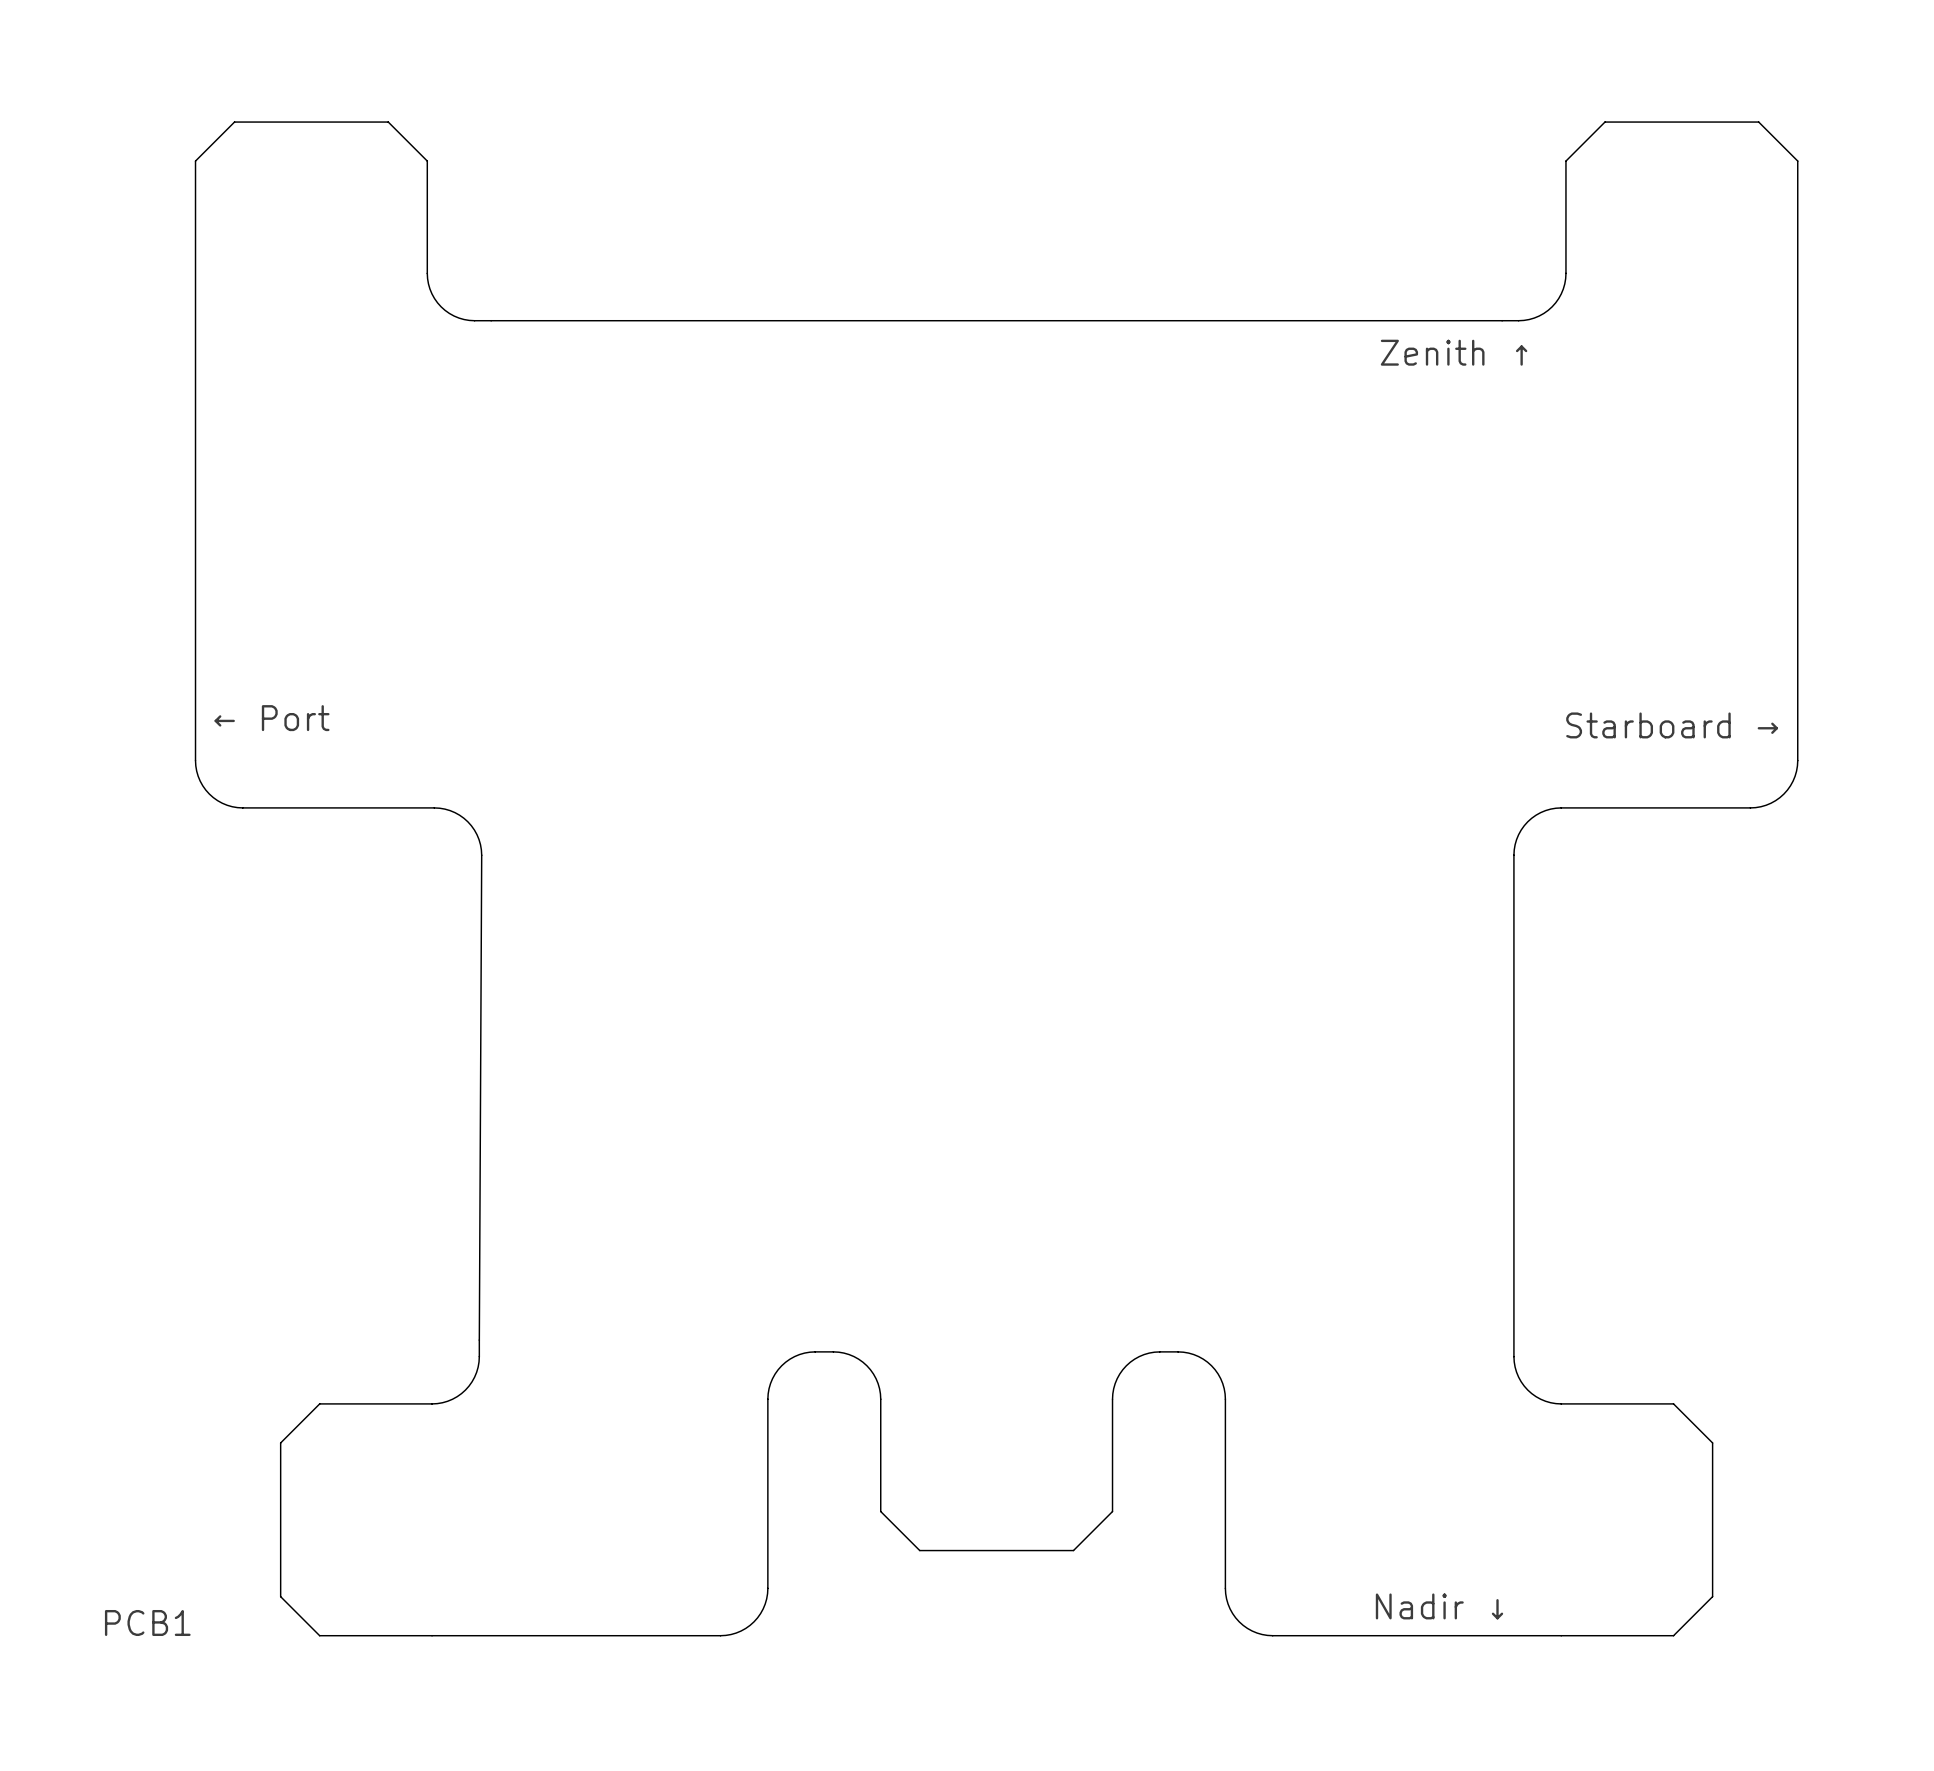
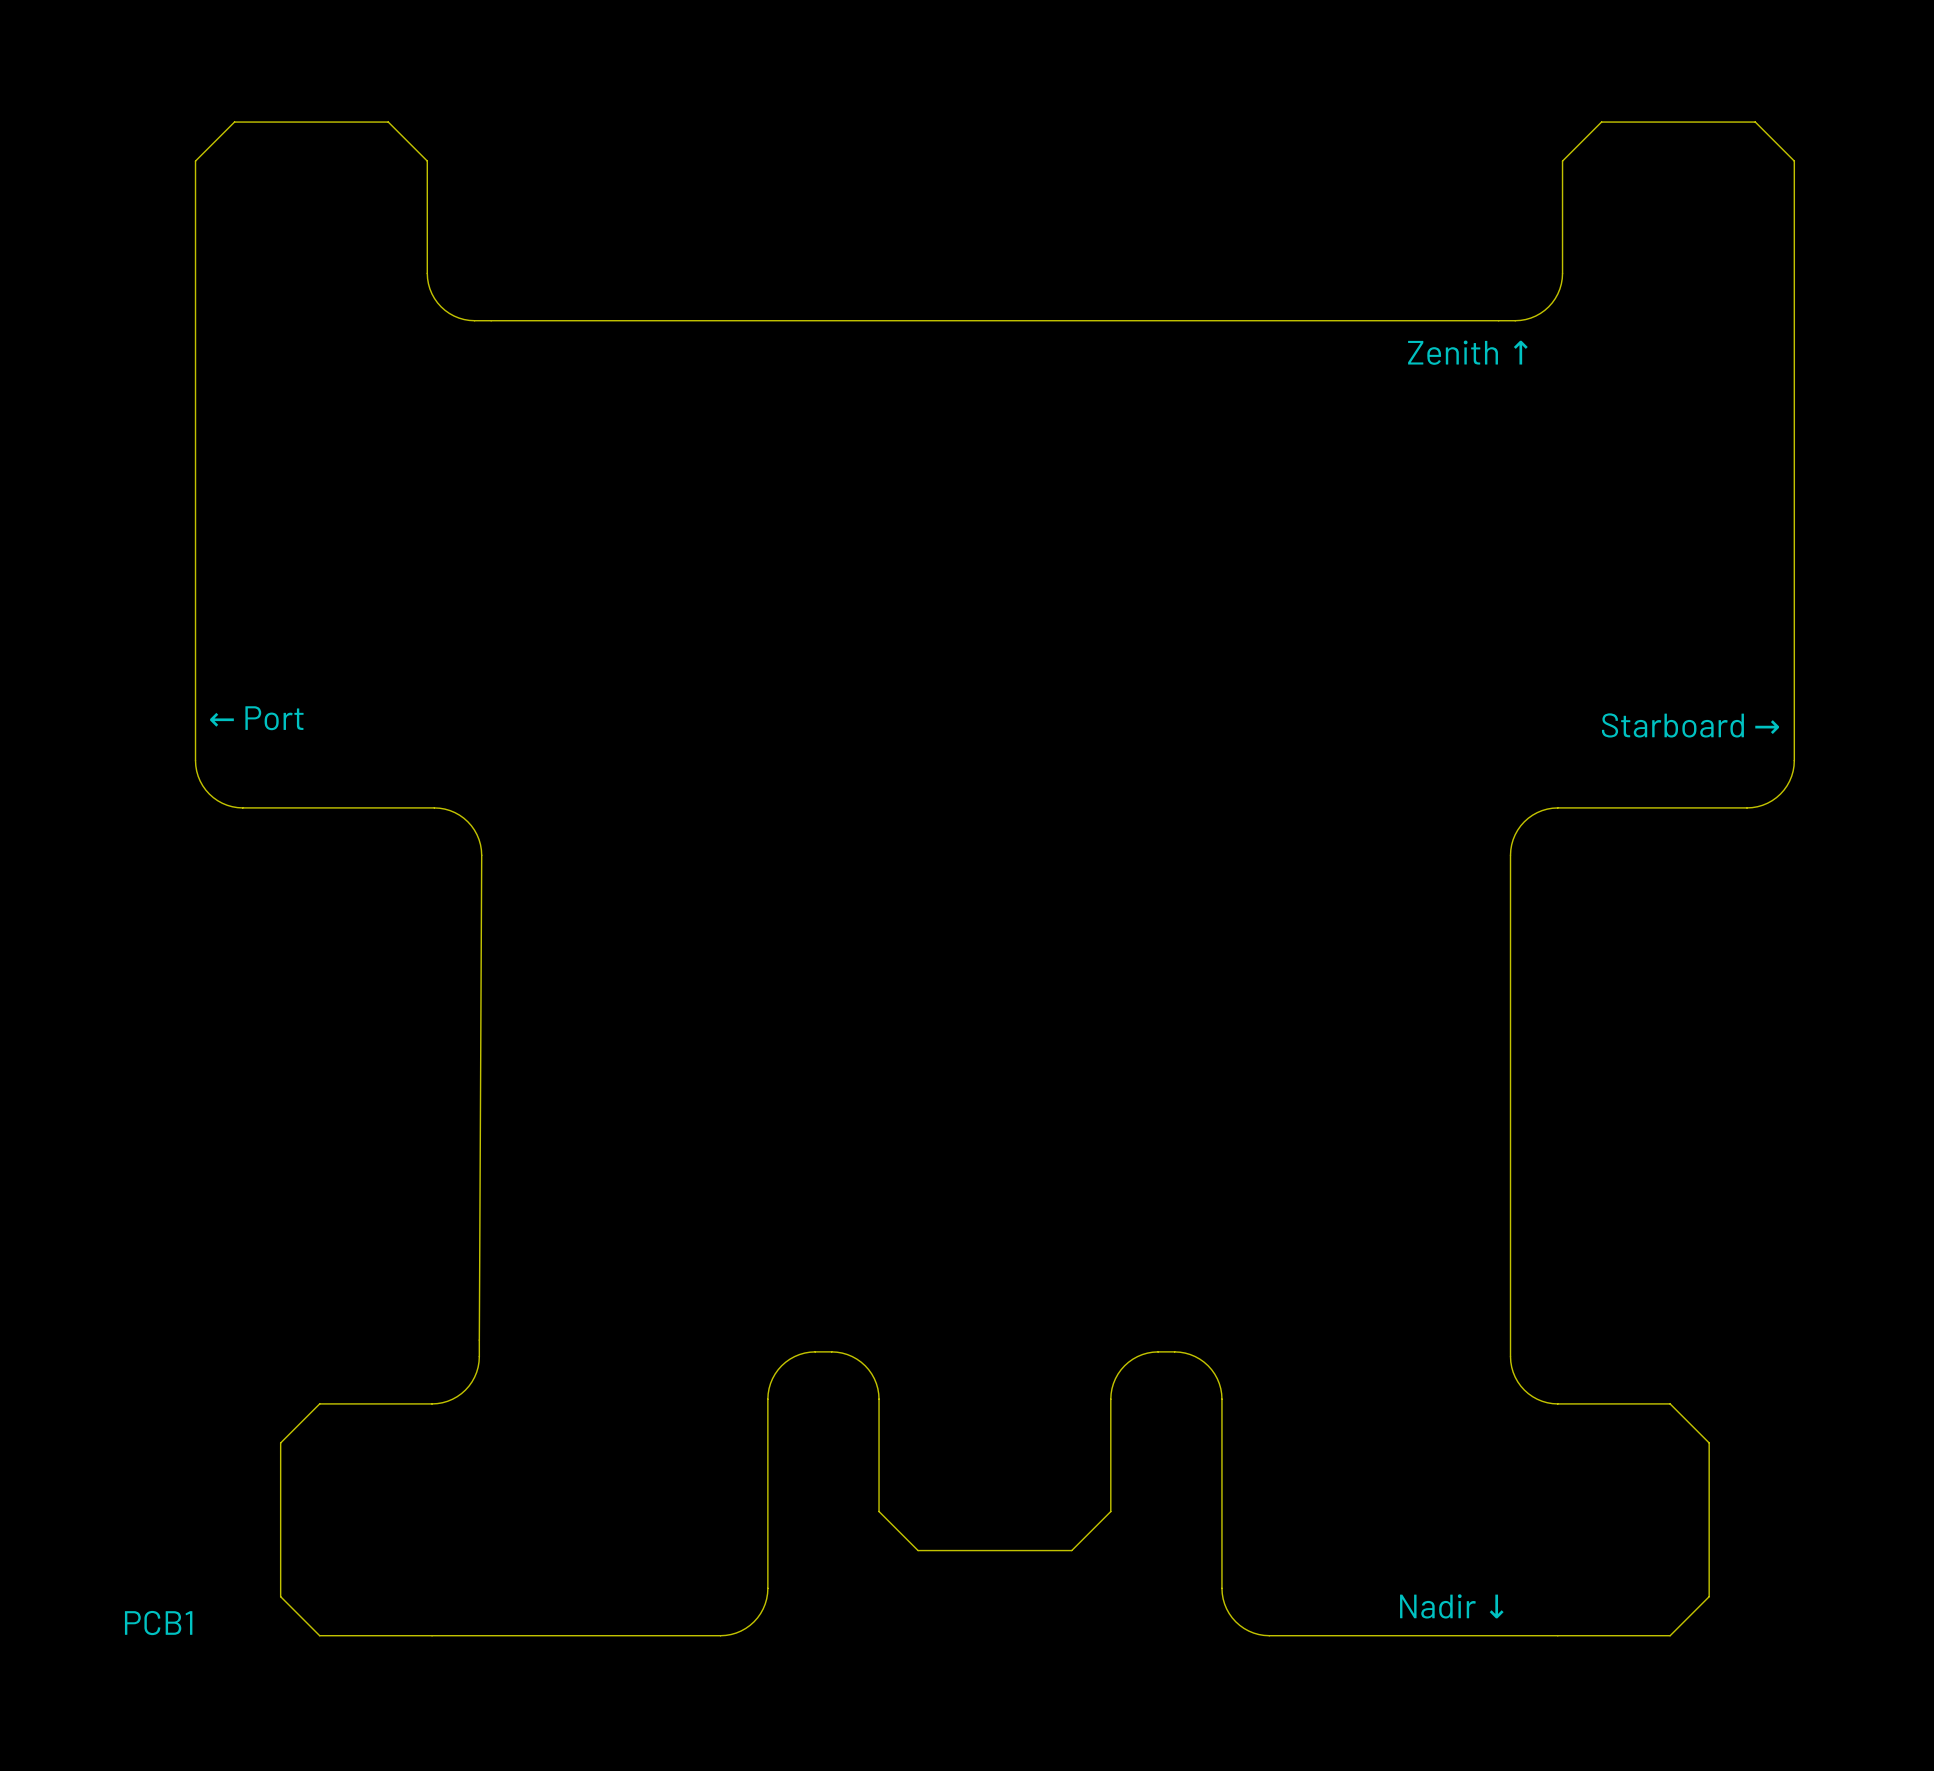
PCB1 footprint: [194, 121, 1799, 1637] -> [194, 121, 1795, 1637]

